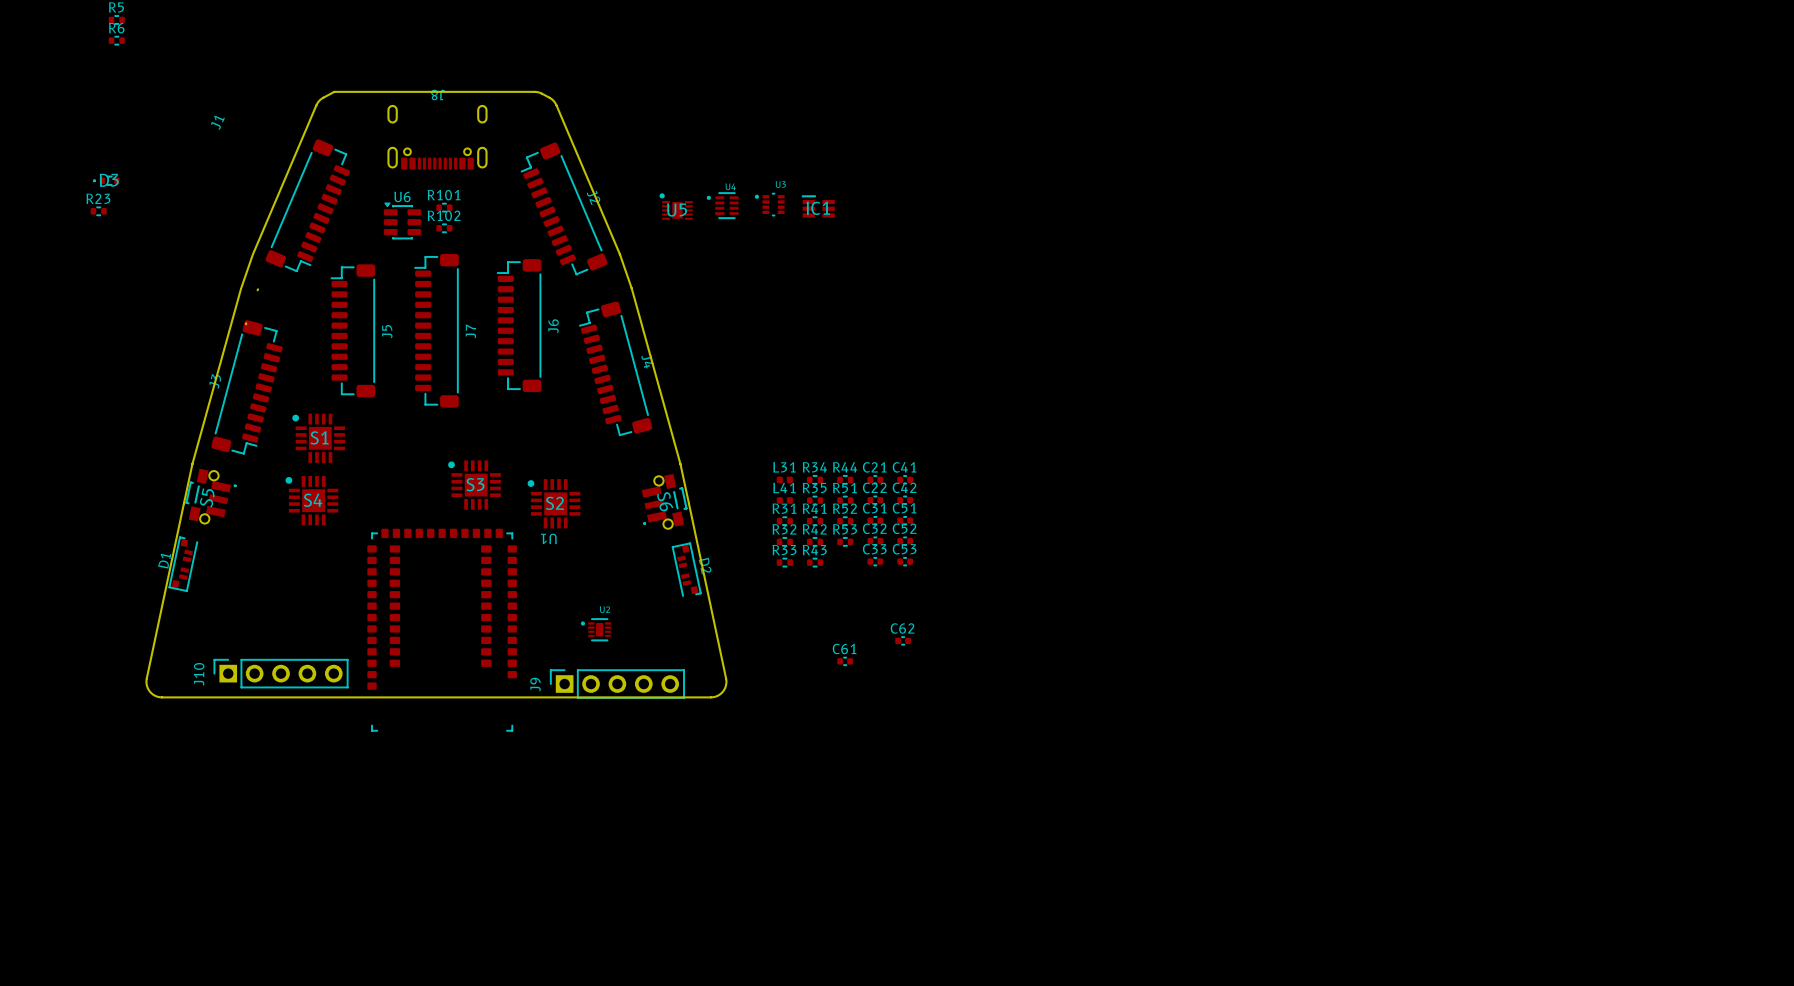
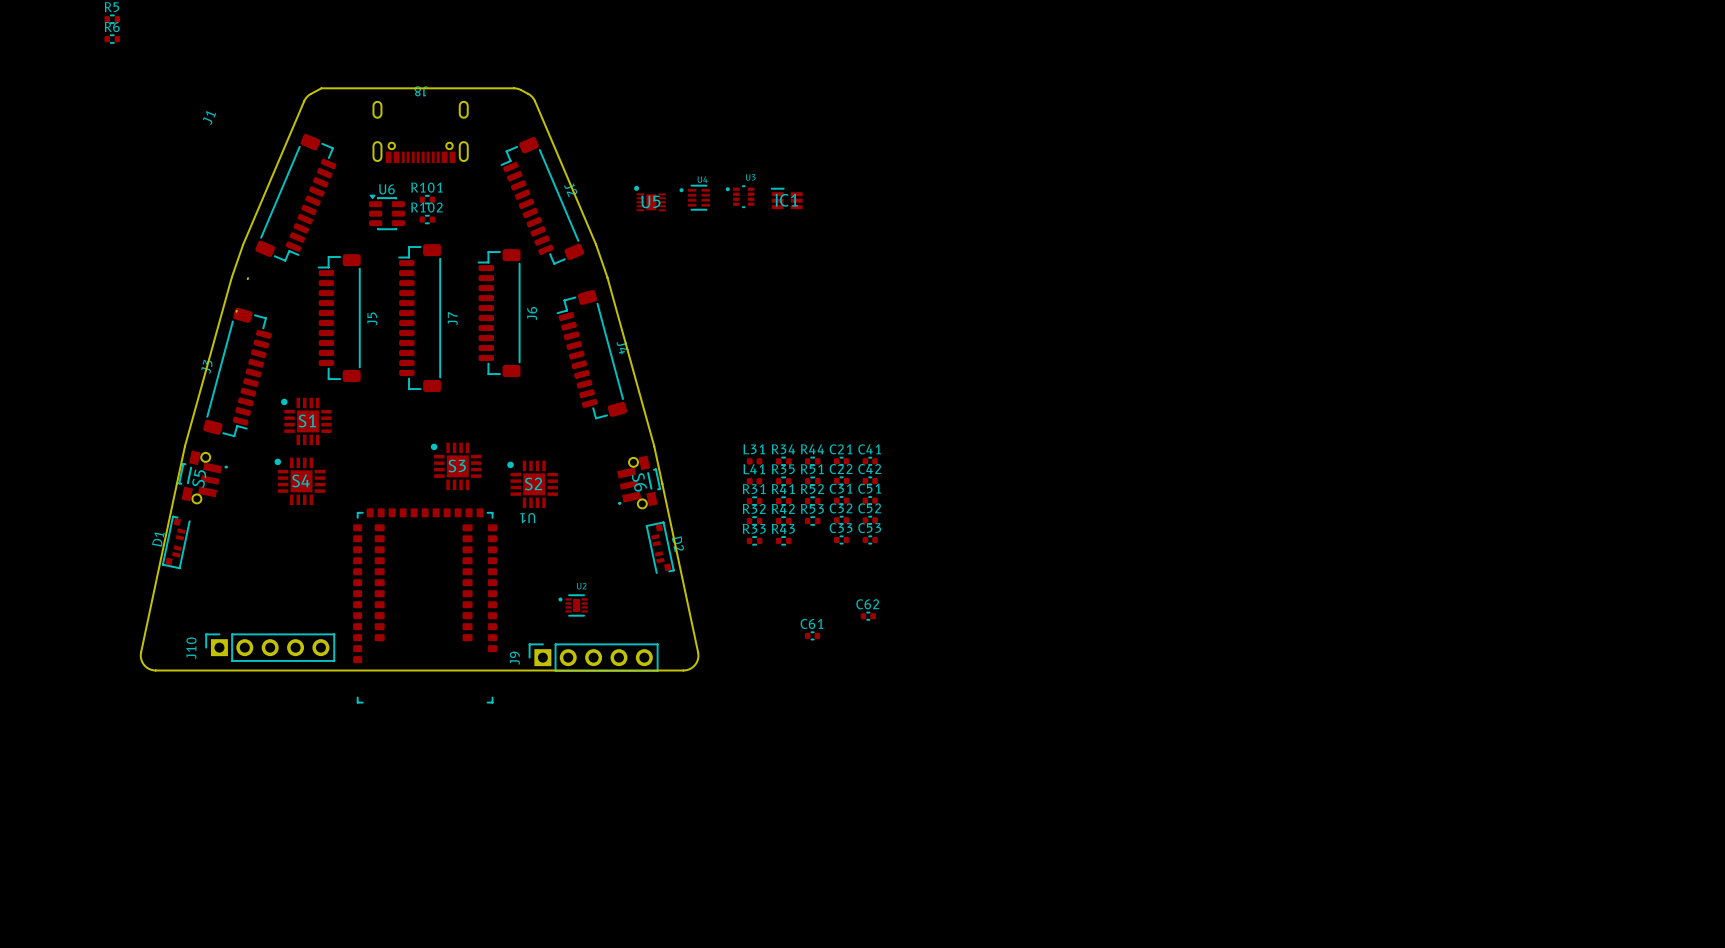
D3: (106, 180) -> none
R23: (98, 211) -> none

